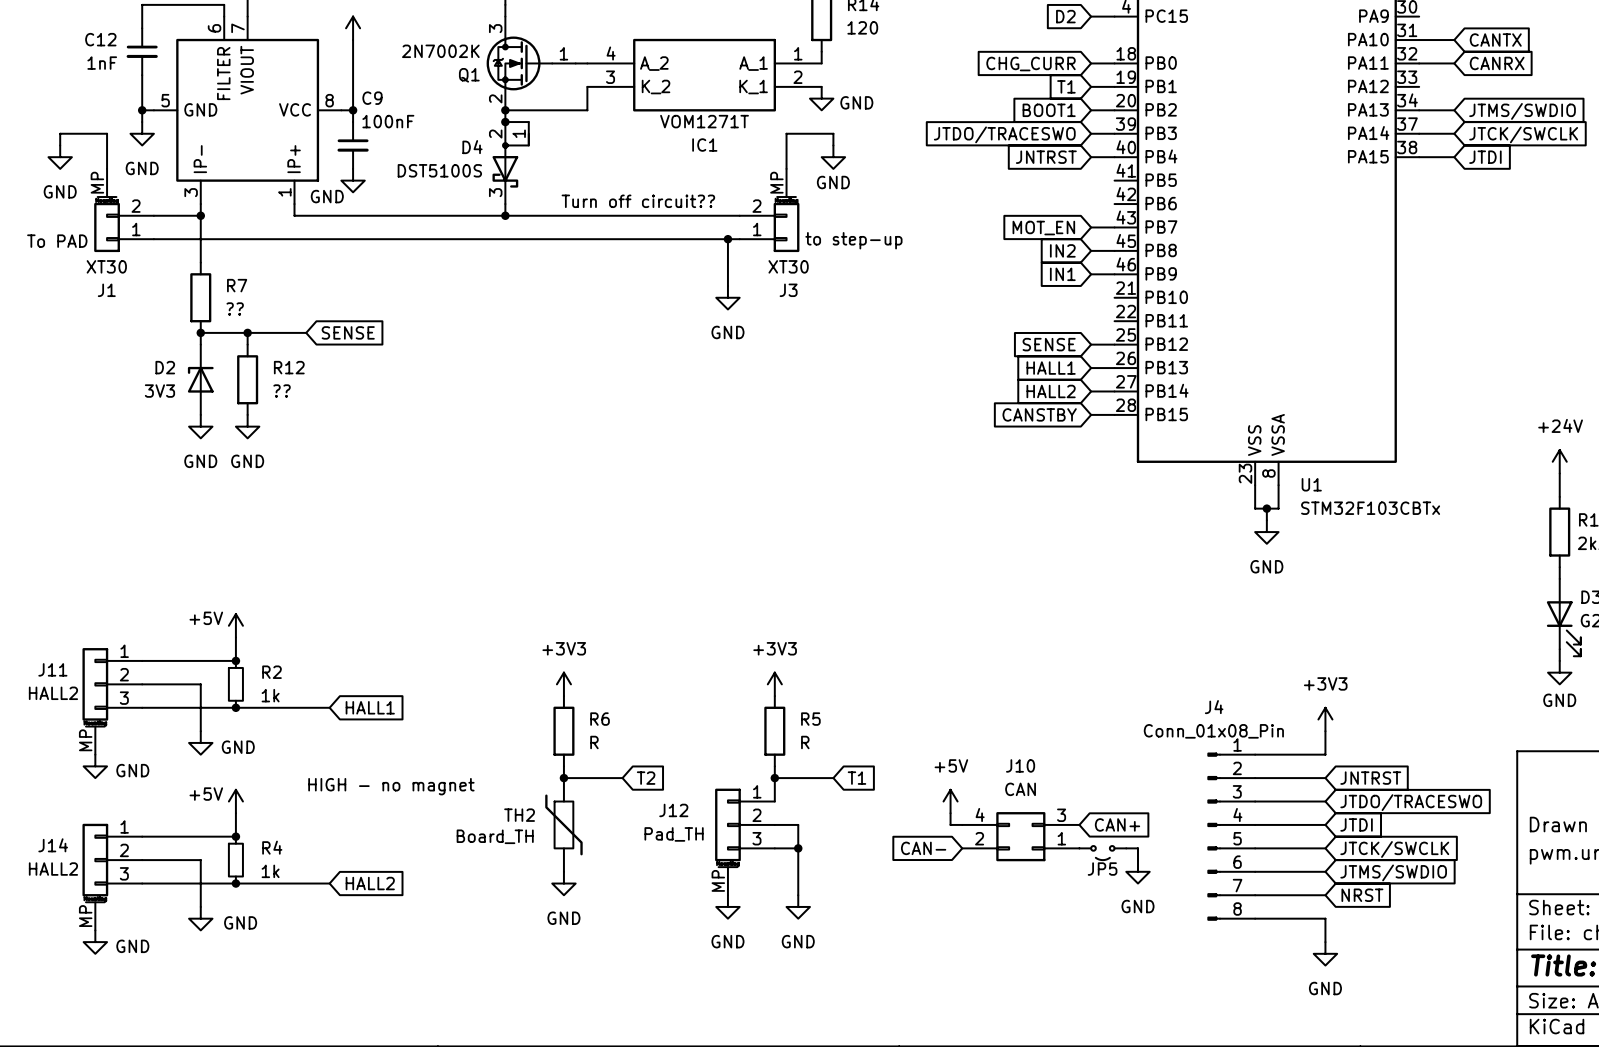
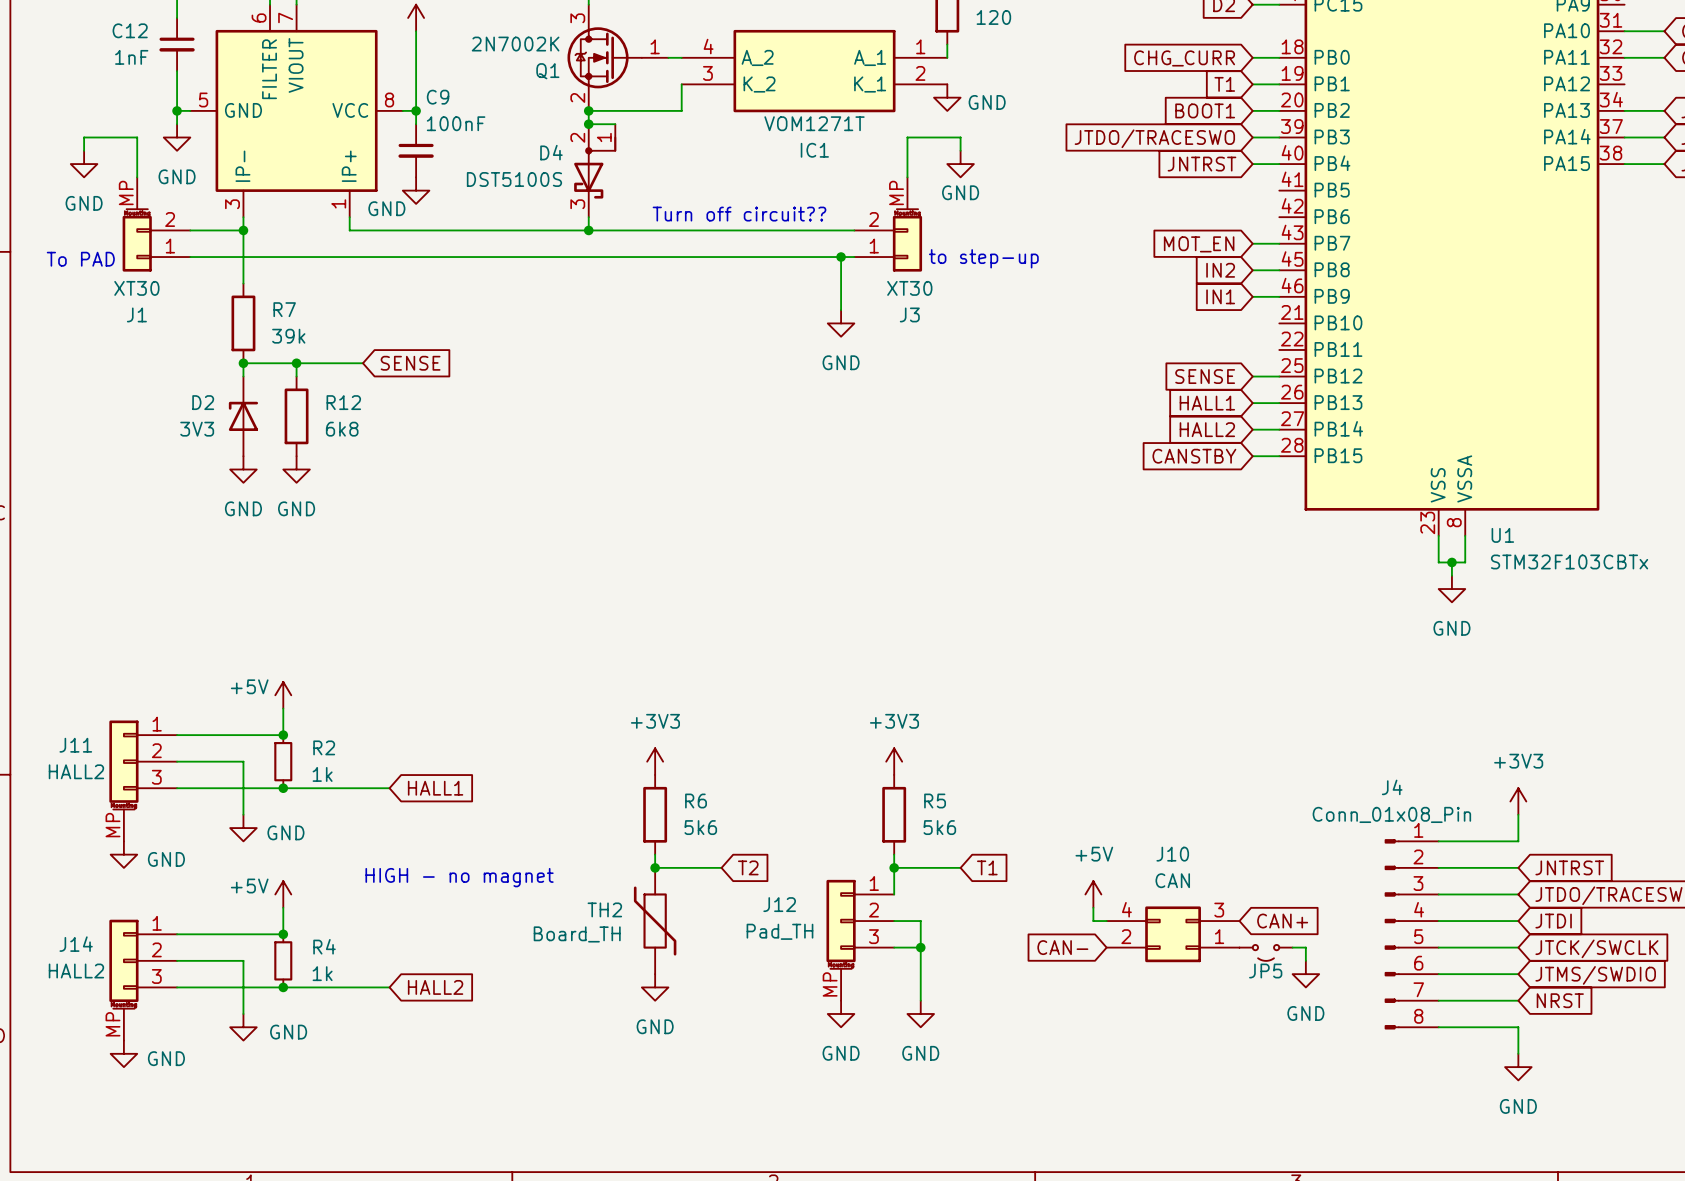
R7 value: ?? (235, 309) -> 39k (288, 336)
R12 value: ?? (282, 391) -> 6k8 (342, 429)
R6 value: R (594, 742) -> 5k6 (700, 827)
R5 value: R (805, 742) -> 5k6 (939, 827)

